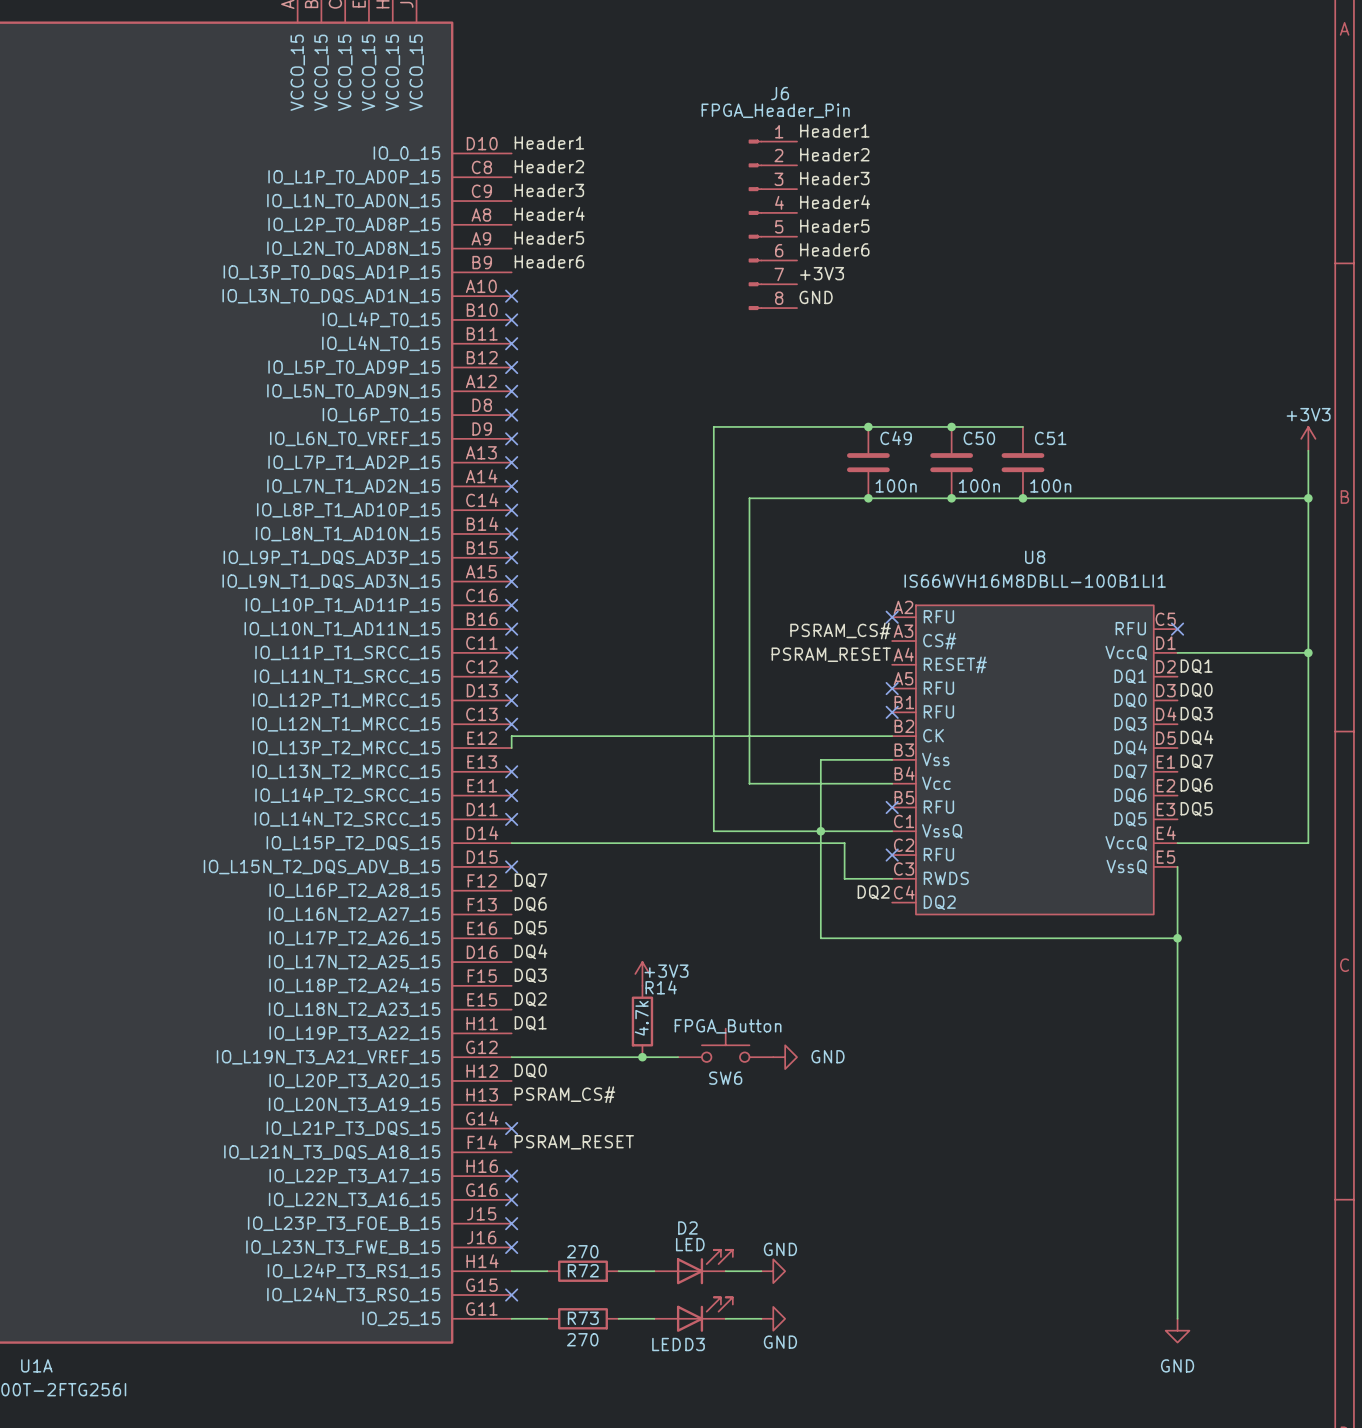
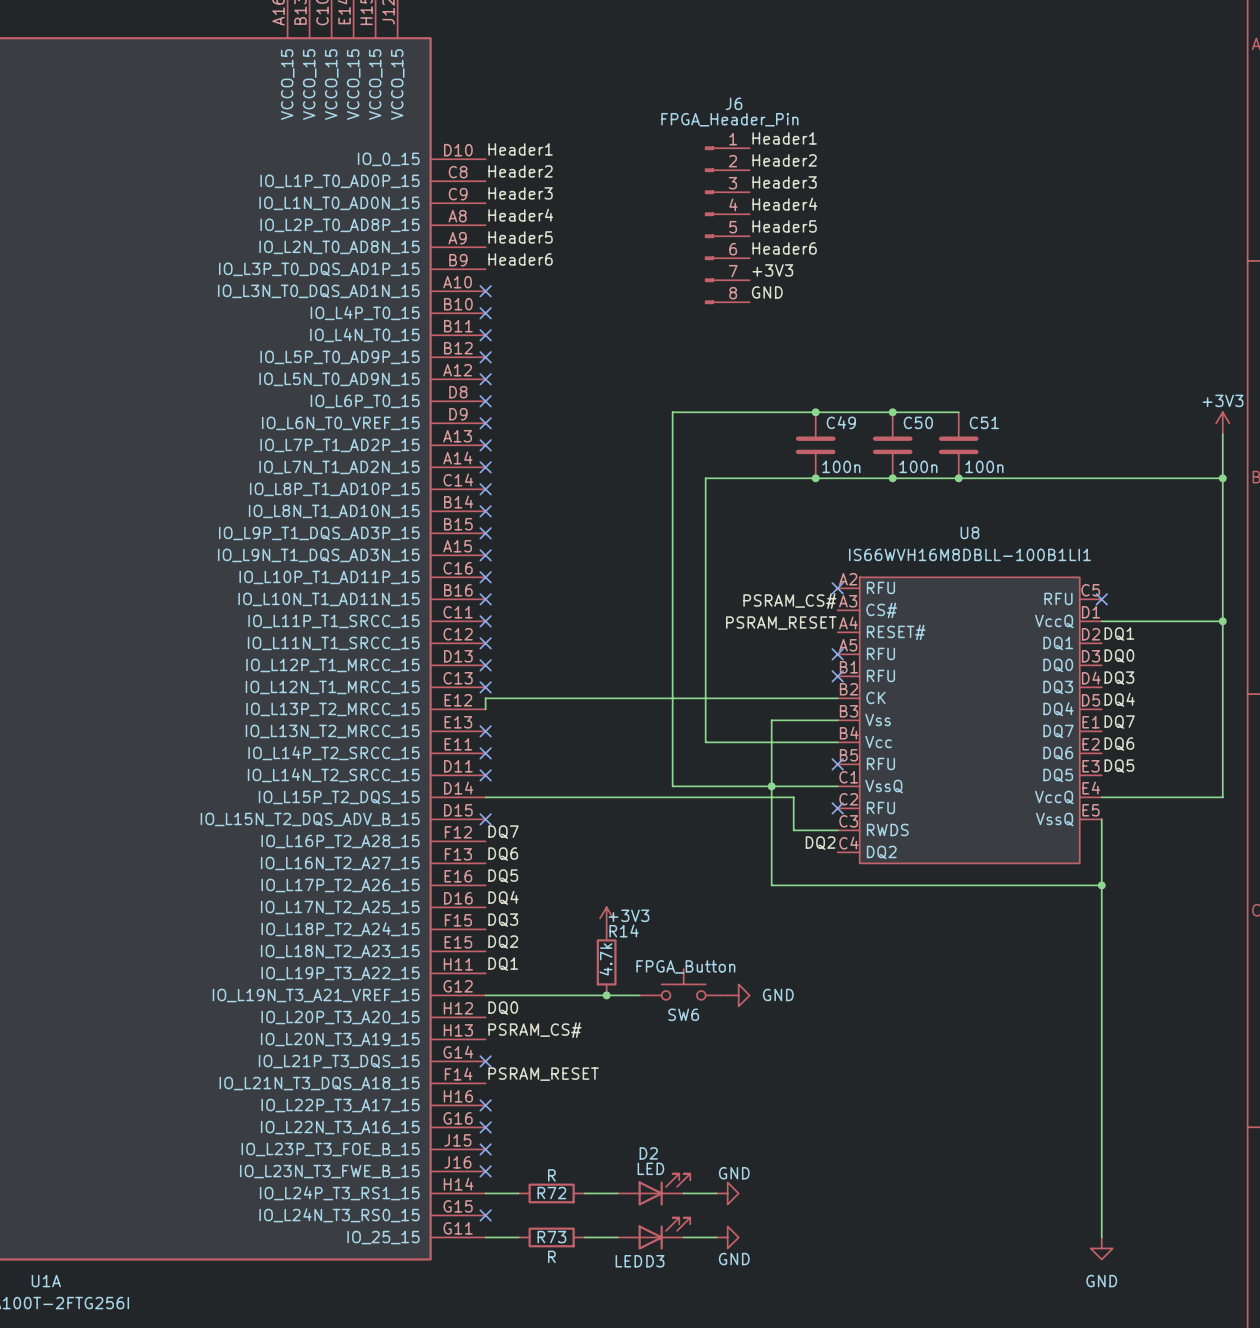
R72 value: 270 (582, 1251) -> R (551, 1175)
R73 value: 270 (582, 1339) -> R (551, 1256)

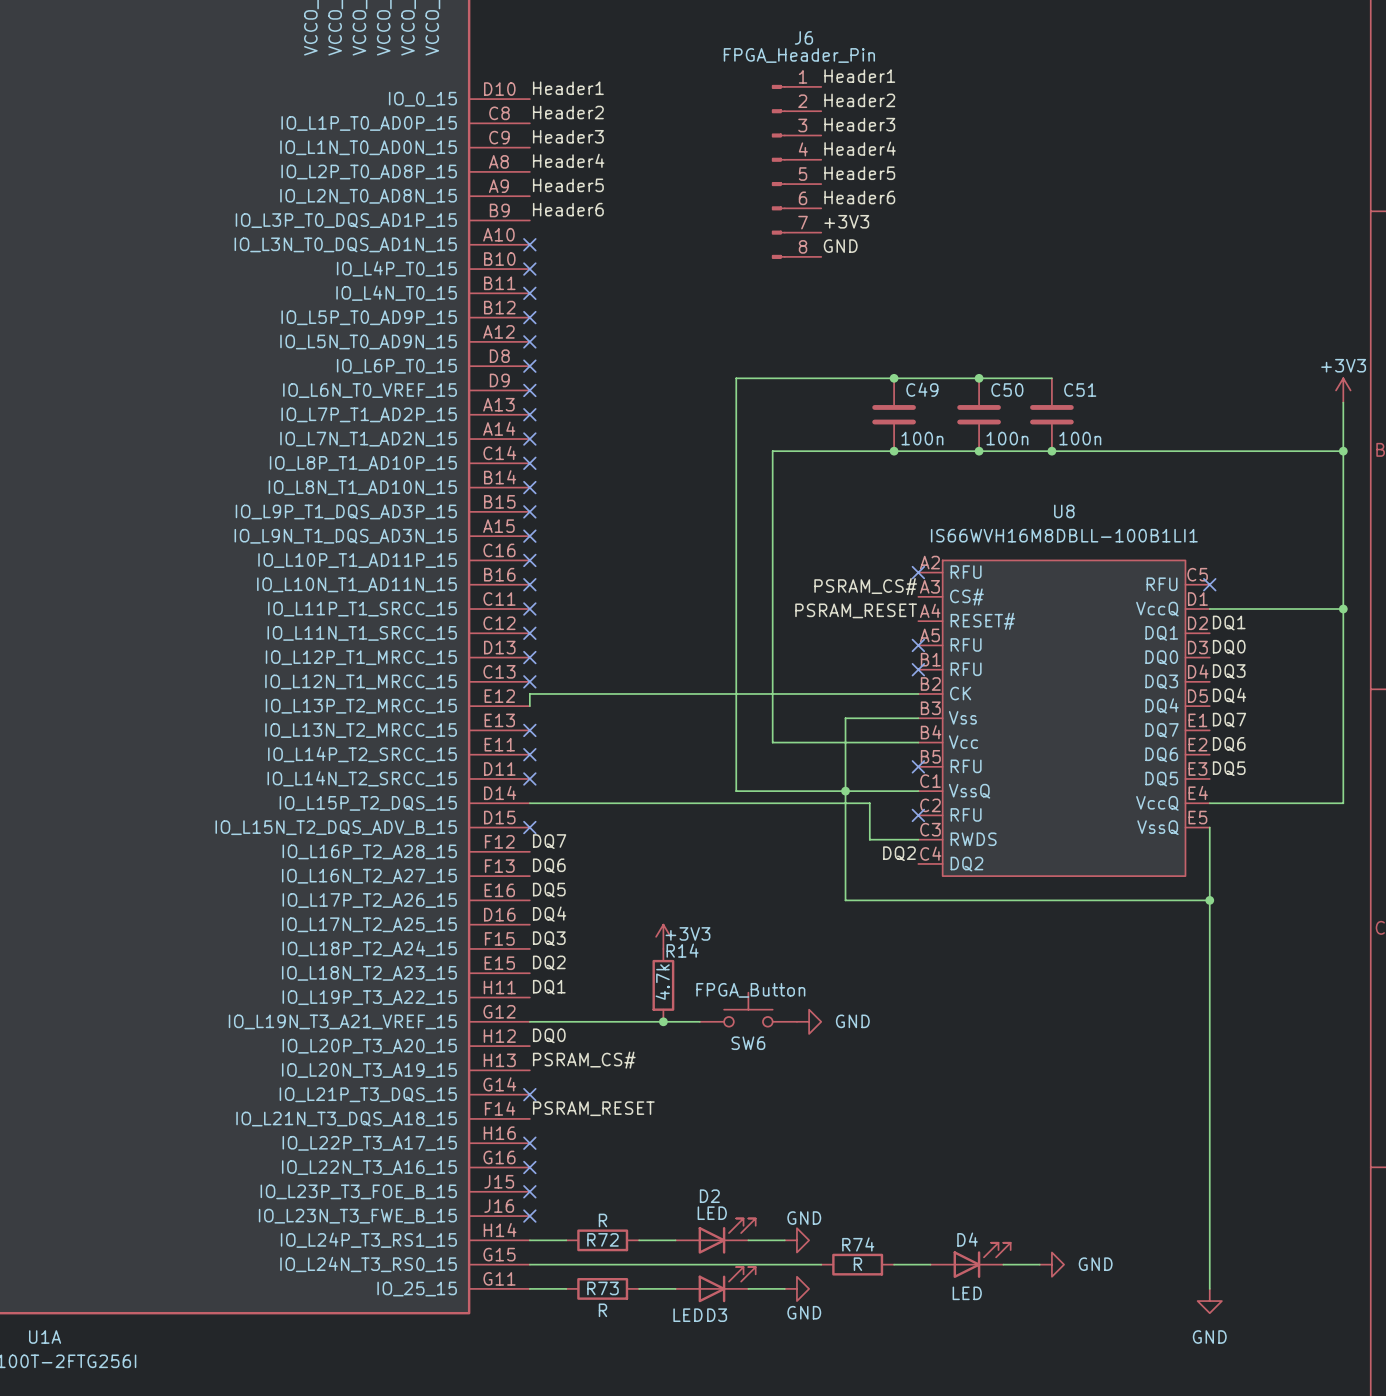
D4: none -> LED (970, 1260)
wire: none -> (529, 1264) (821, 1264)
no-connect mark: (485, 1215) -> none
R74: none -> R (857, 1264)
wire: none -> (894, 1264) (930, 1264)
wire: none -> (1003, 1264) (1039, 1264)
power symbol: none -> GND (1051, 1264)

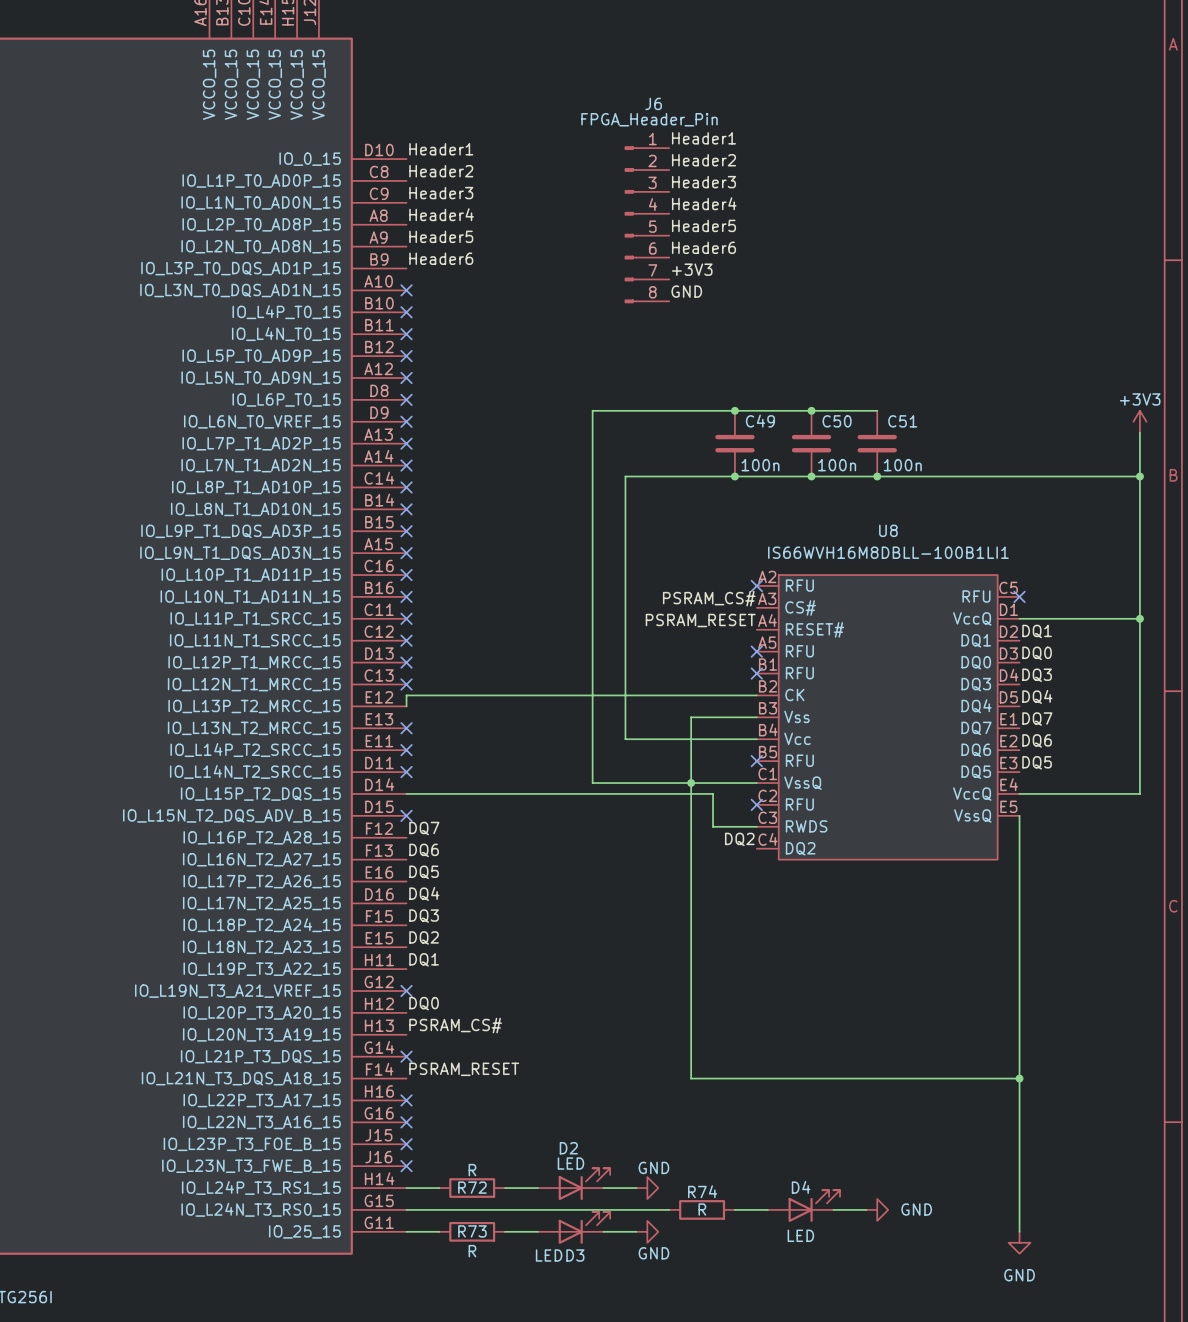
wire: (845, 900) (1209, 900) -> (691, 881) (691, 1078) (1019, 1078)
junction: (1209, 900) -> none
power symbol: +3V3 (663, 936) -> none
R14: 4.7k (663, 985) -> none
SW6: FPGA_Button (748, 1009) -> none
wire: (529, 1021) (699, 1021) -> none
no-connect mark: none -> (406, 990)
junction: (663, 1021) -> none
power symbol: GND (809, 1021) -> none
junction: none -> (1019, 1078)

